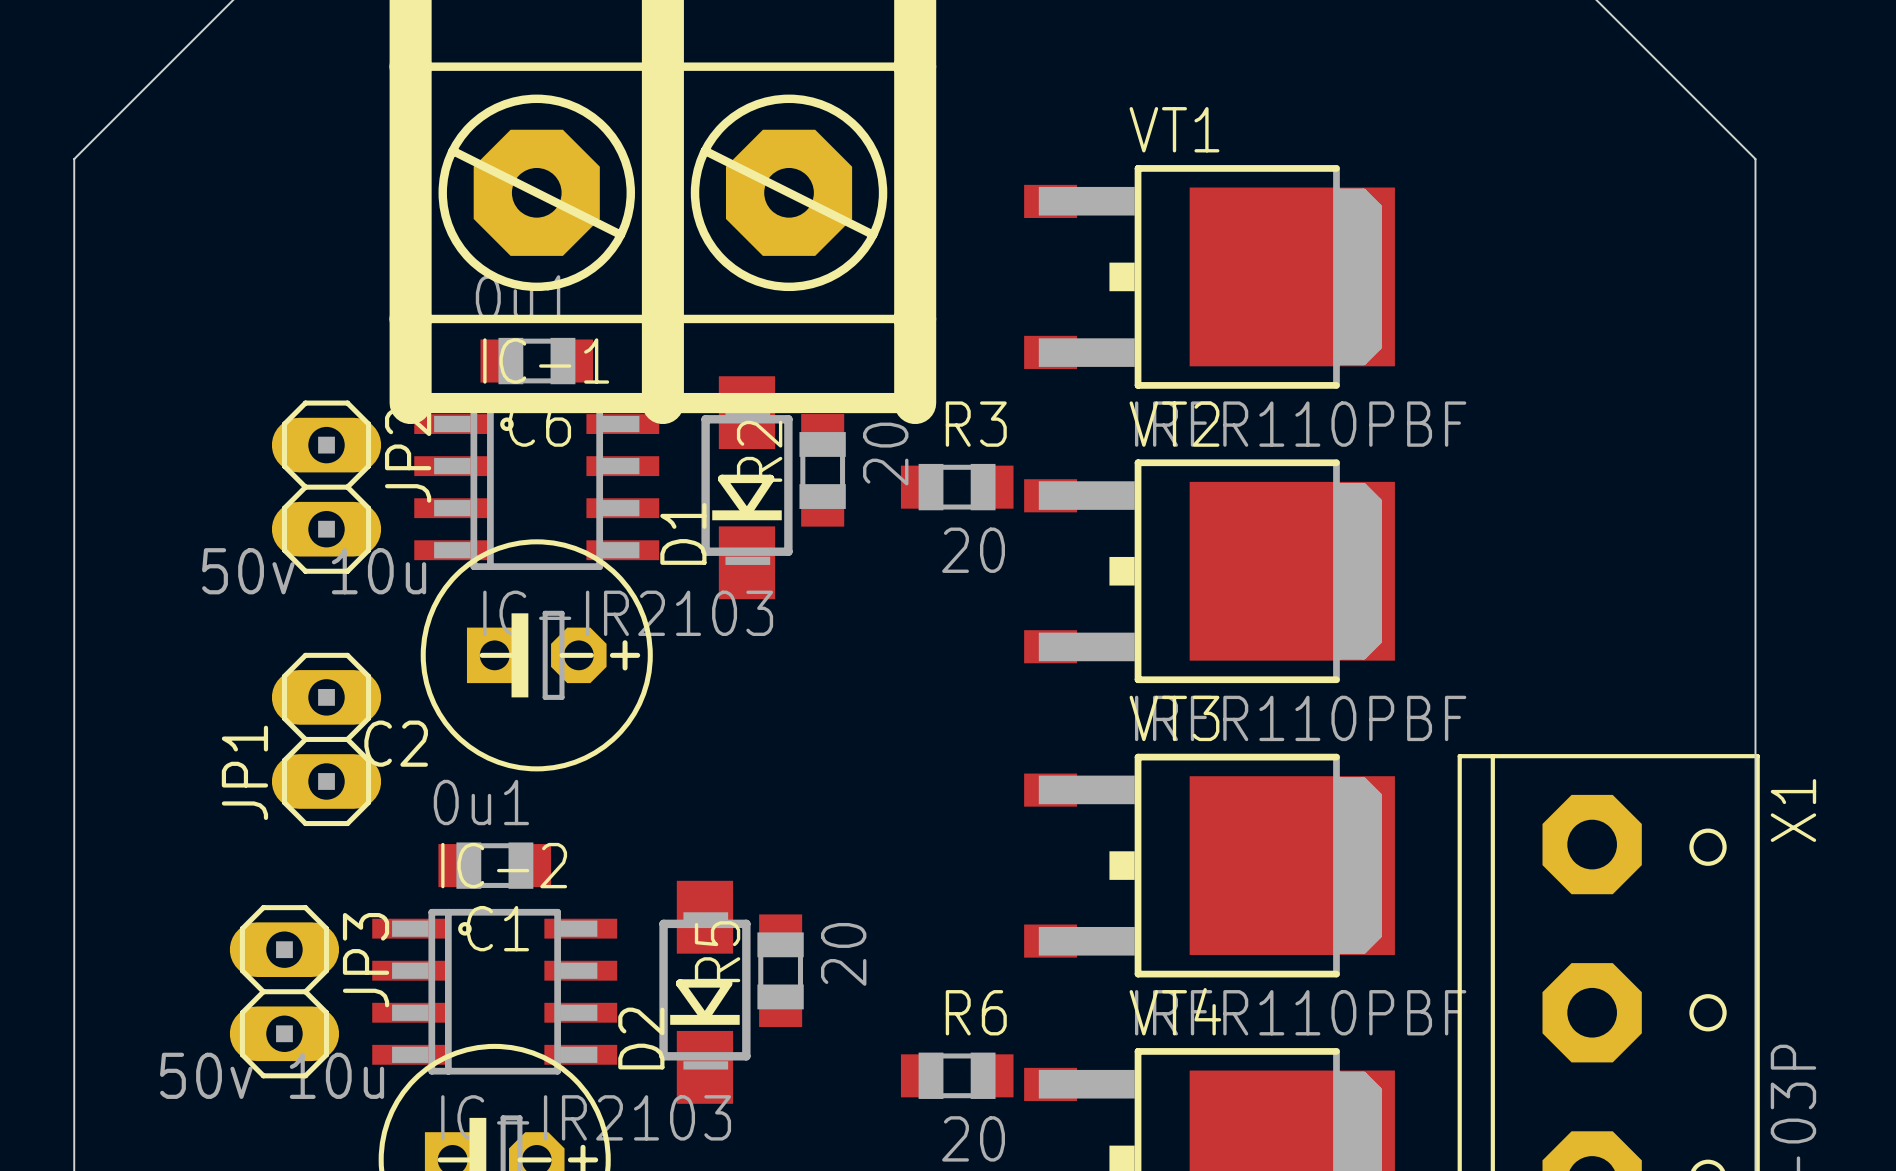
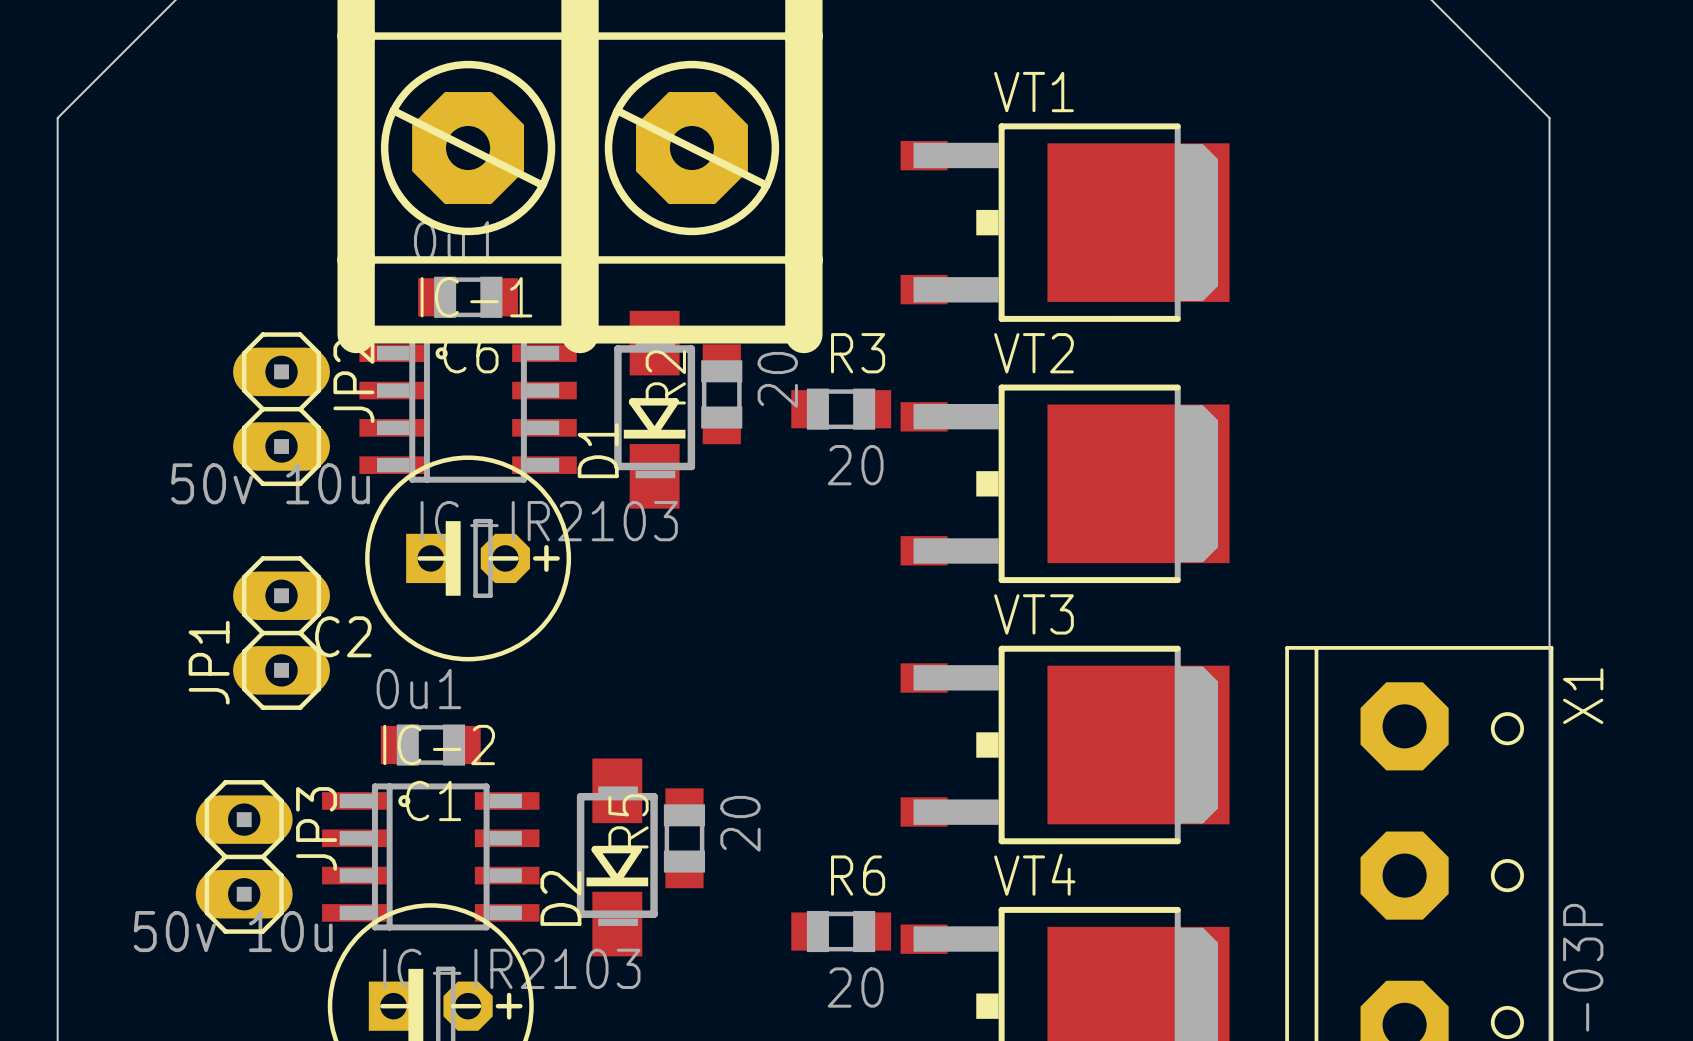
VT1 value: IRFR110PBF (1300, 424) -> none
VT2 value: IRFR110PBF (1300, 718) -> none
VT3 value: IRFR110PBF (1300, 1012) -> none

